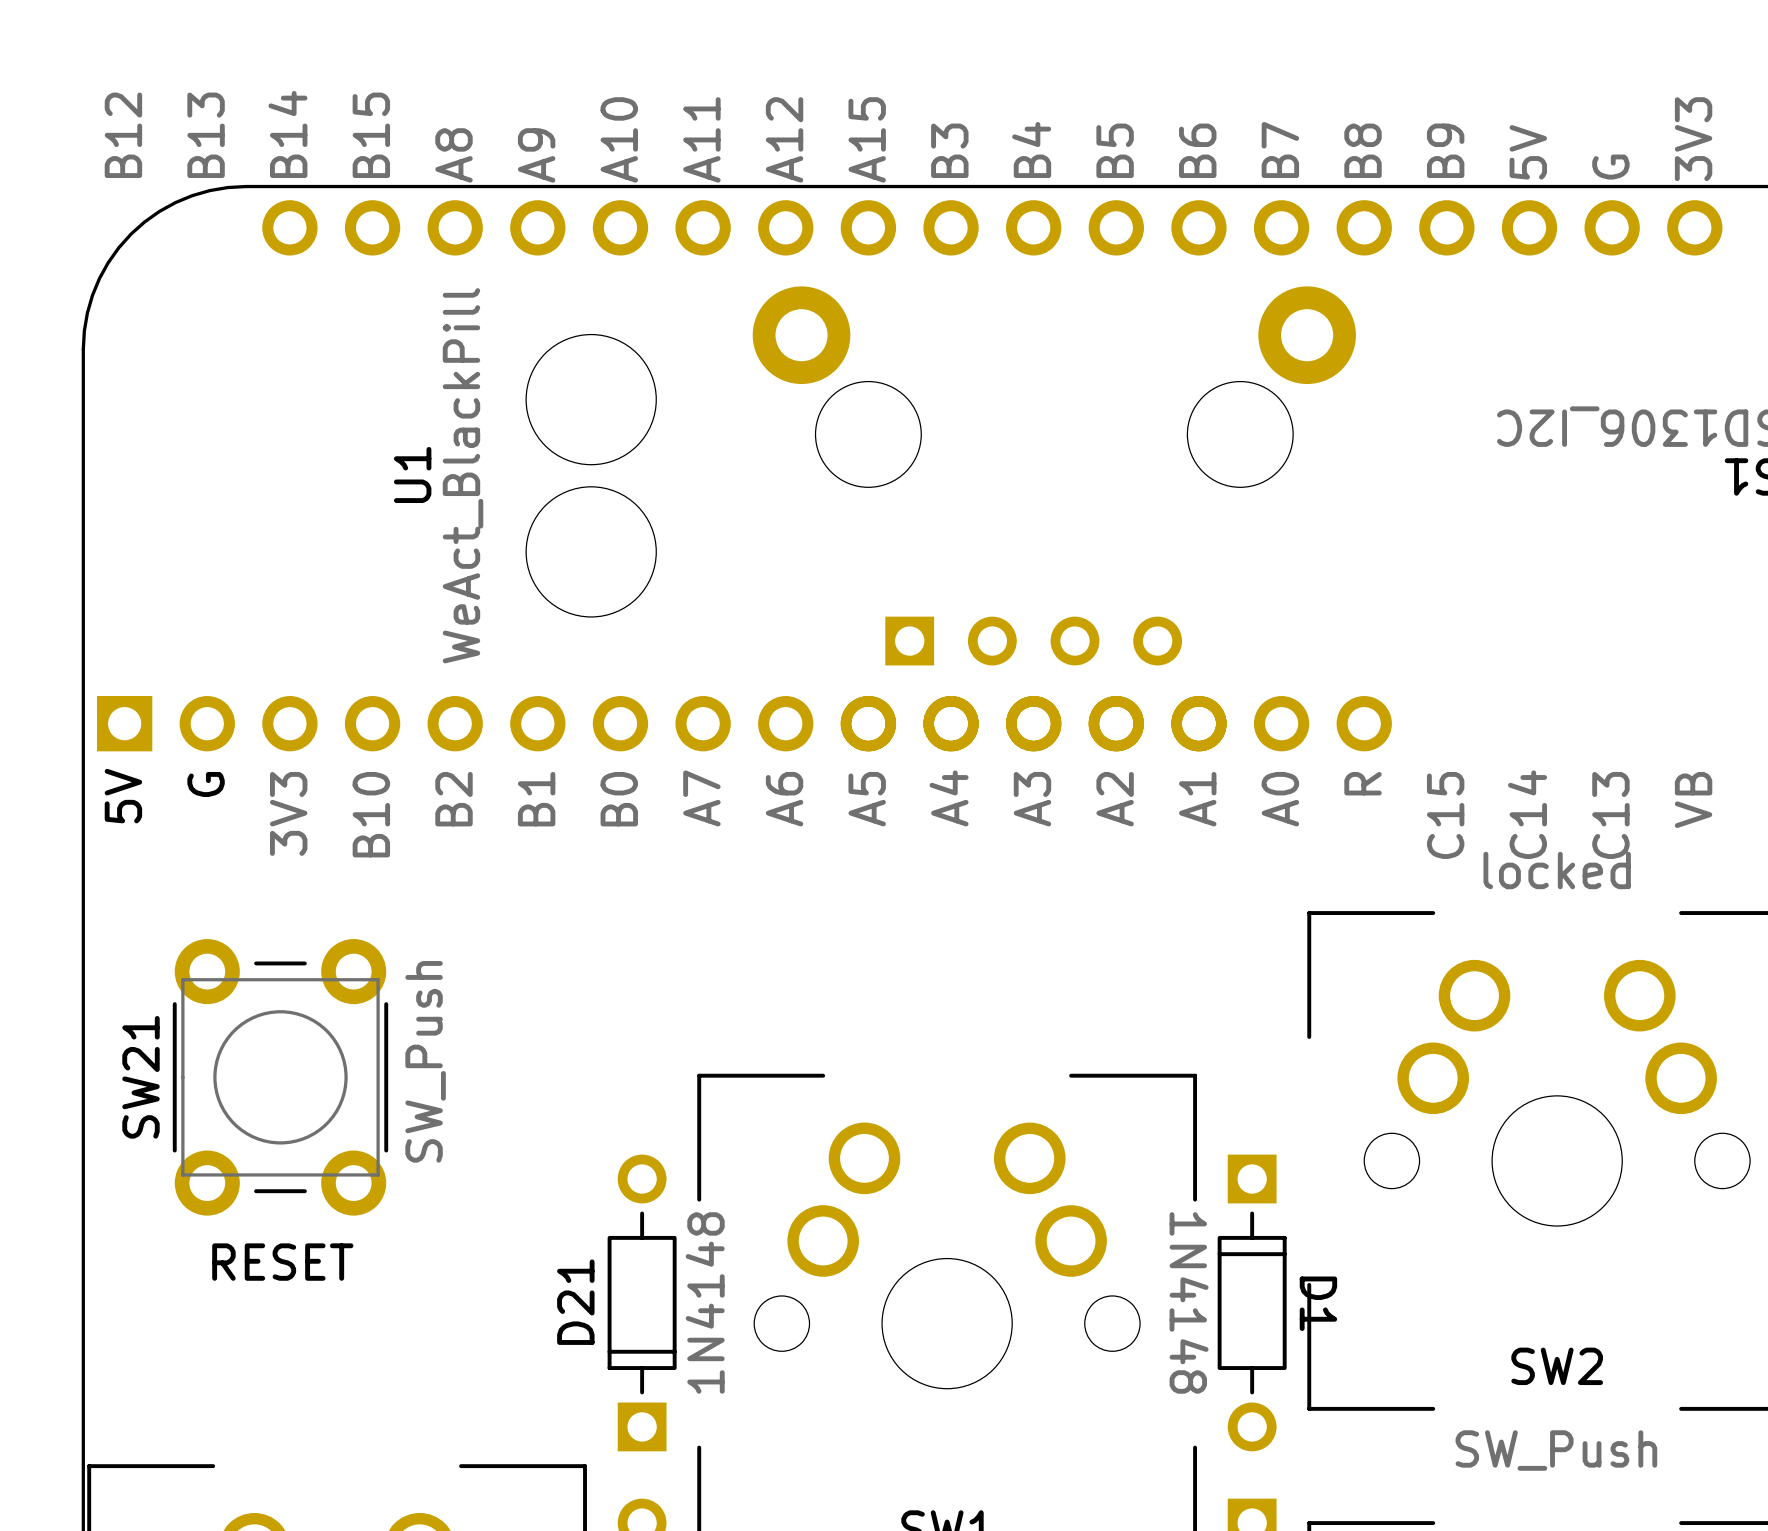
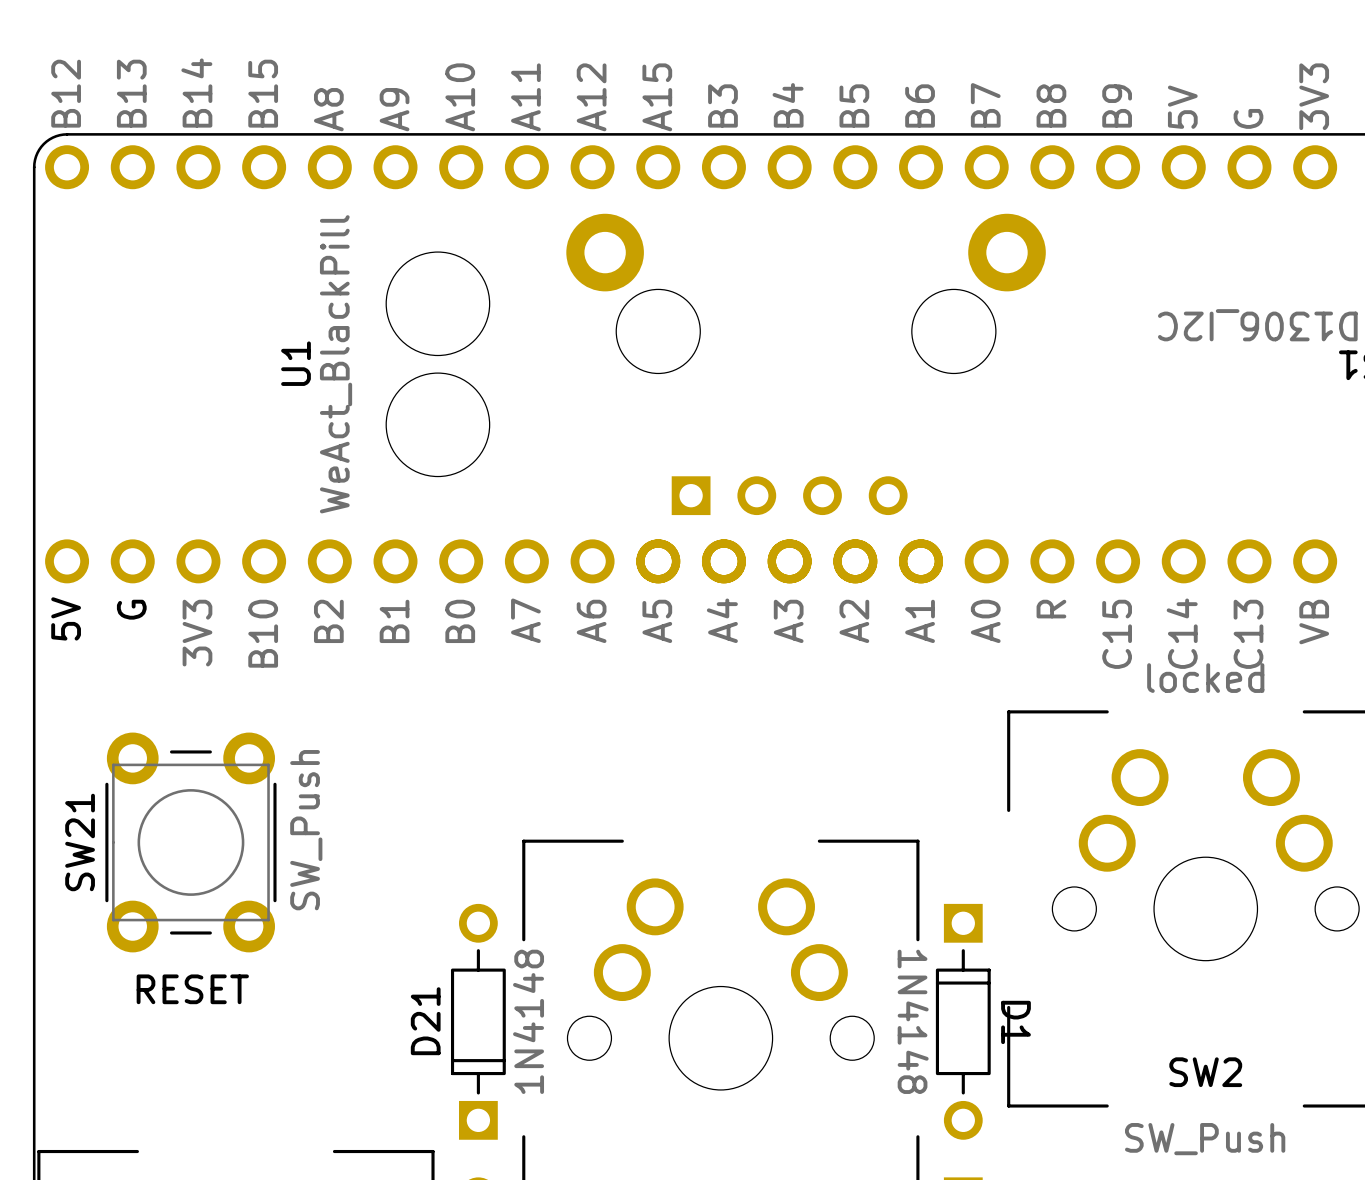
board edge: (246, 186) (209, 190) (175, 202) (144, 222) (130, 234) (118, 247) (99, 278) (87, 313) (83, 349) -> (163, 134) (63, 134) (52, 137) (43, 144) (37, 152) (34, 163) (34, 263)
U1 footprint: [96, 200, 1723, 752] -> [45, 145, 1338, 584]

